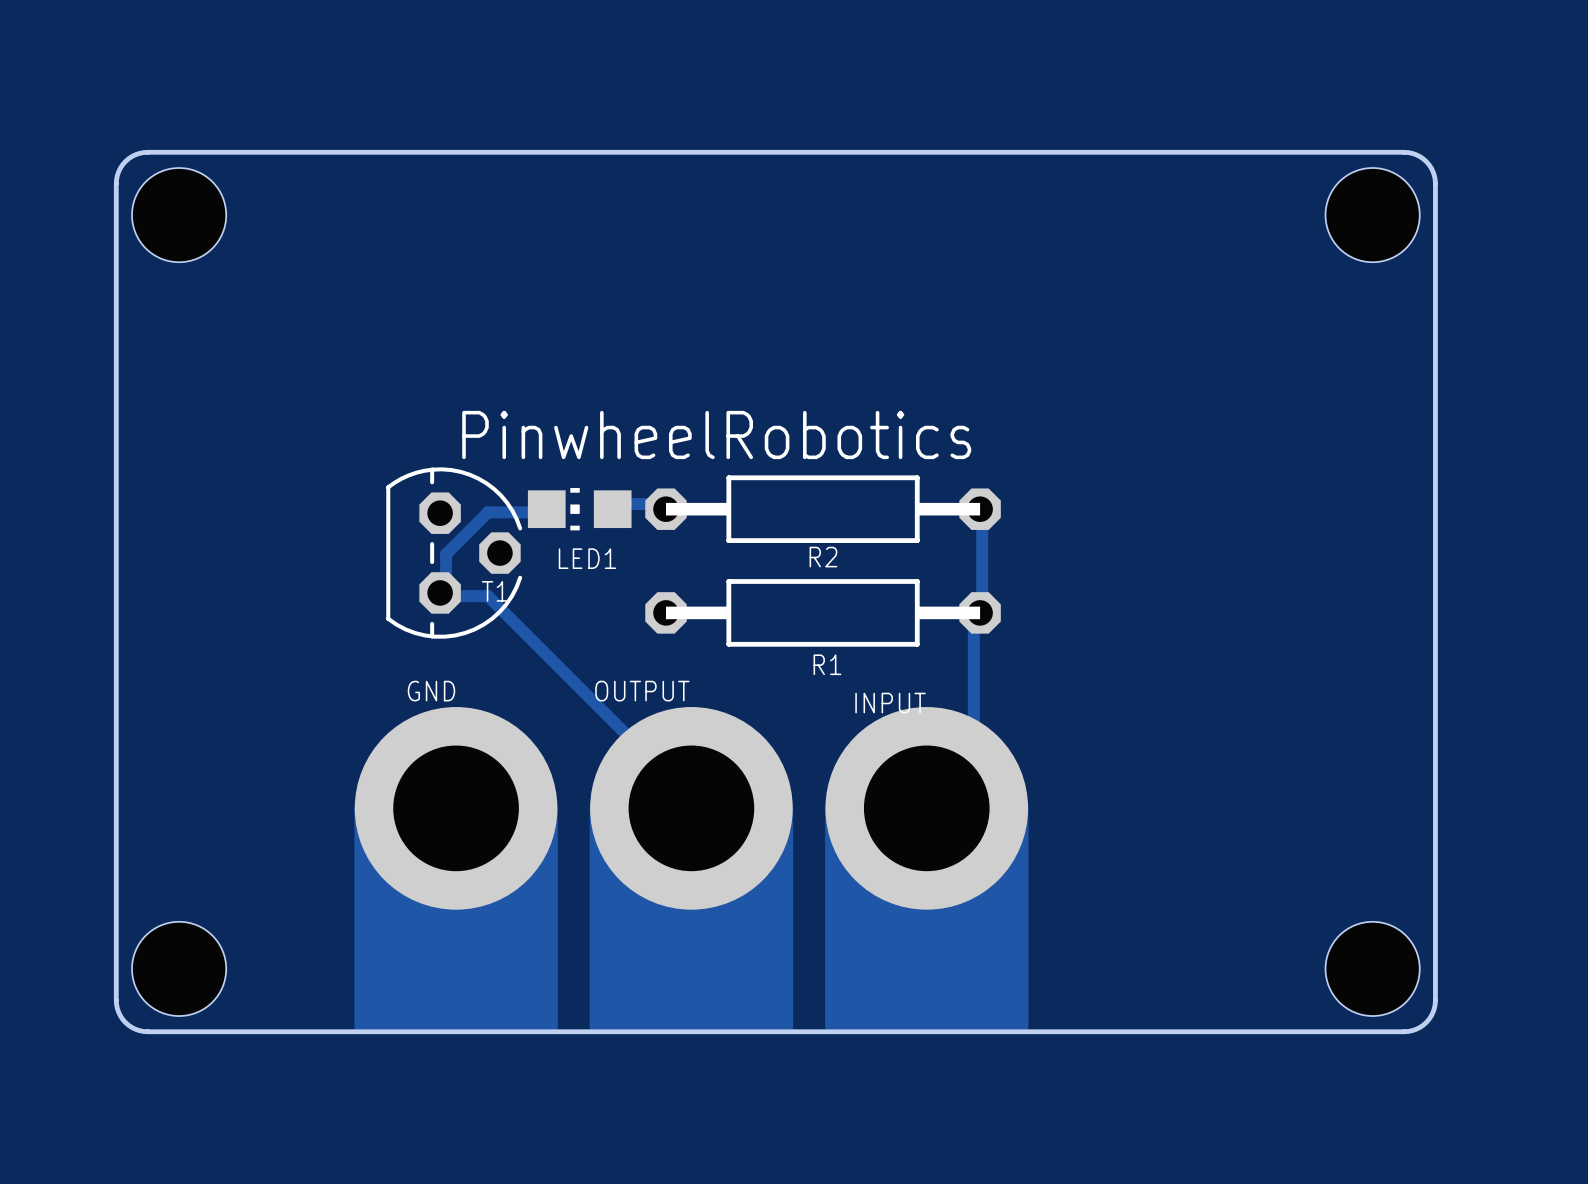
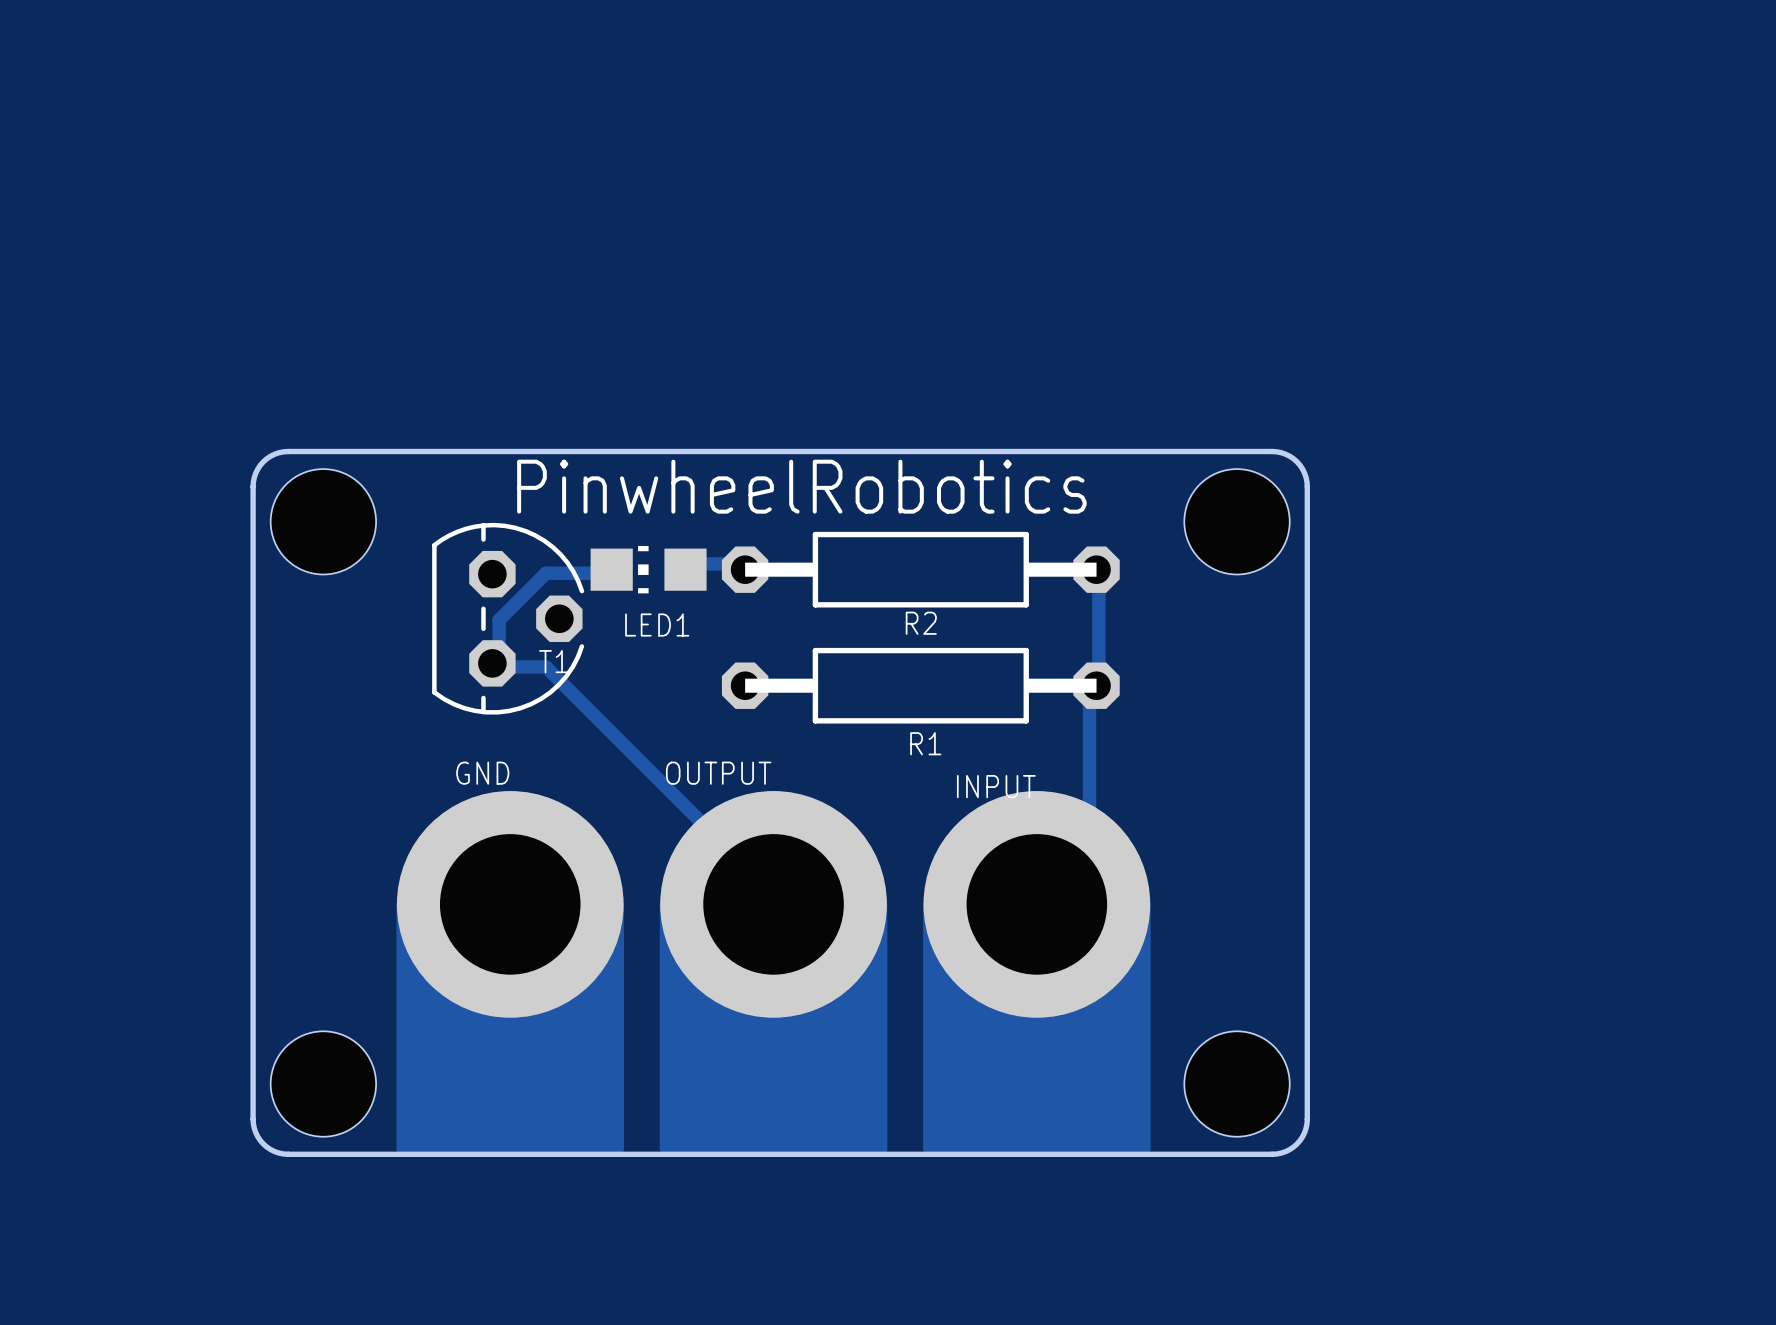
hole: (179, 215) -> none
hole: (1372, 215) -> none
hole: none -> (323, 521)
hole: none -> (1237, 521)
hole position: (179, 968) -> (323, 1084)
hole position: (1372, 968) -> (1237, 1084)
board edge: (257, 1031) (143, 1031) (135, 1029) (125, 1022) (118, 1012) (116, 1004) (116, 183) (118, 171) (128, 158) (135, 154) (147, 152) (1412, 153) (1423, 158) (1428, 164) (1433, 171) (1435, 183) (1434, 1008) (1428, 1019) (1423, 1025) (1408, 1031) (1137, 1031) -> (288, 1154) (274, 1151) (263, 1144) (255, 1132) (253, 1119) (253, 486) (255, 473) (263, 461) (274, 454) (288, 451) (1272, 451) (1285, 454) (1293, 458) (1304, 473) (1307, 486) (1307, 1119) (1304, 1132) (1297, 1144) (1285, 1151) (1272, 1154)

